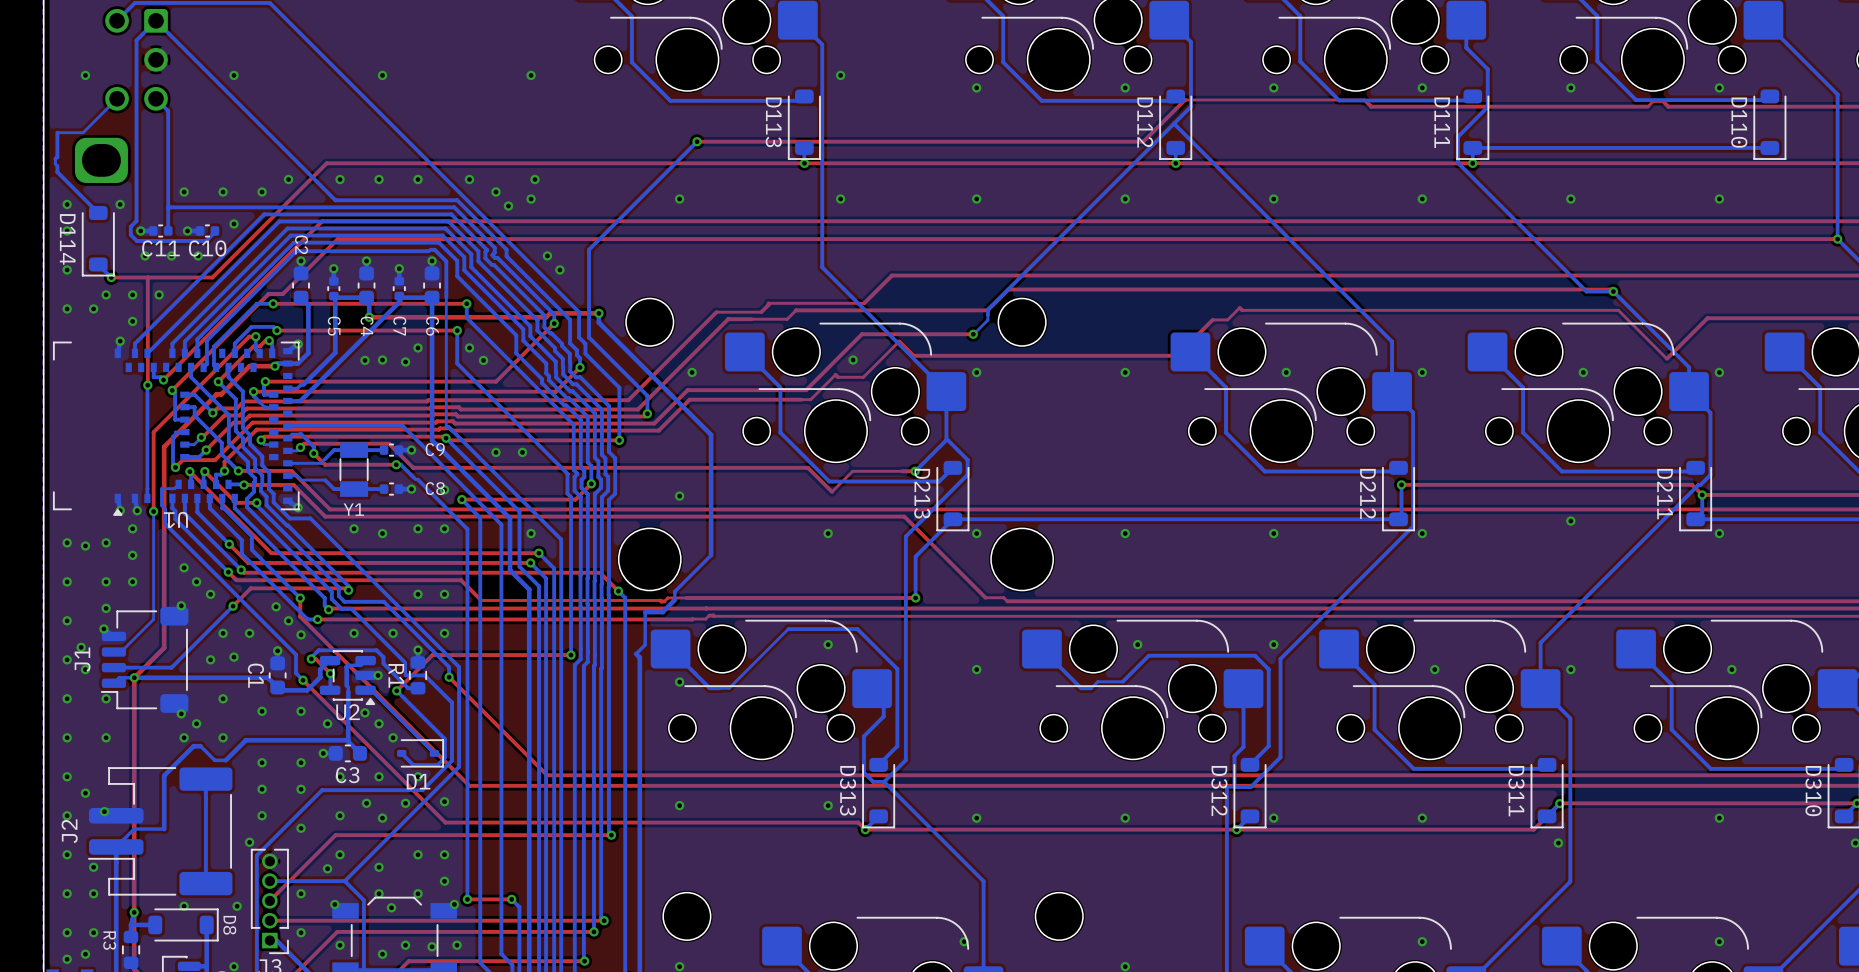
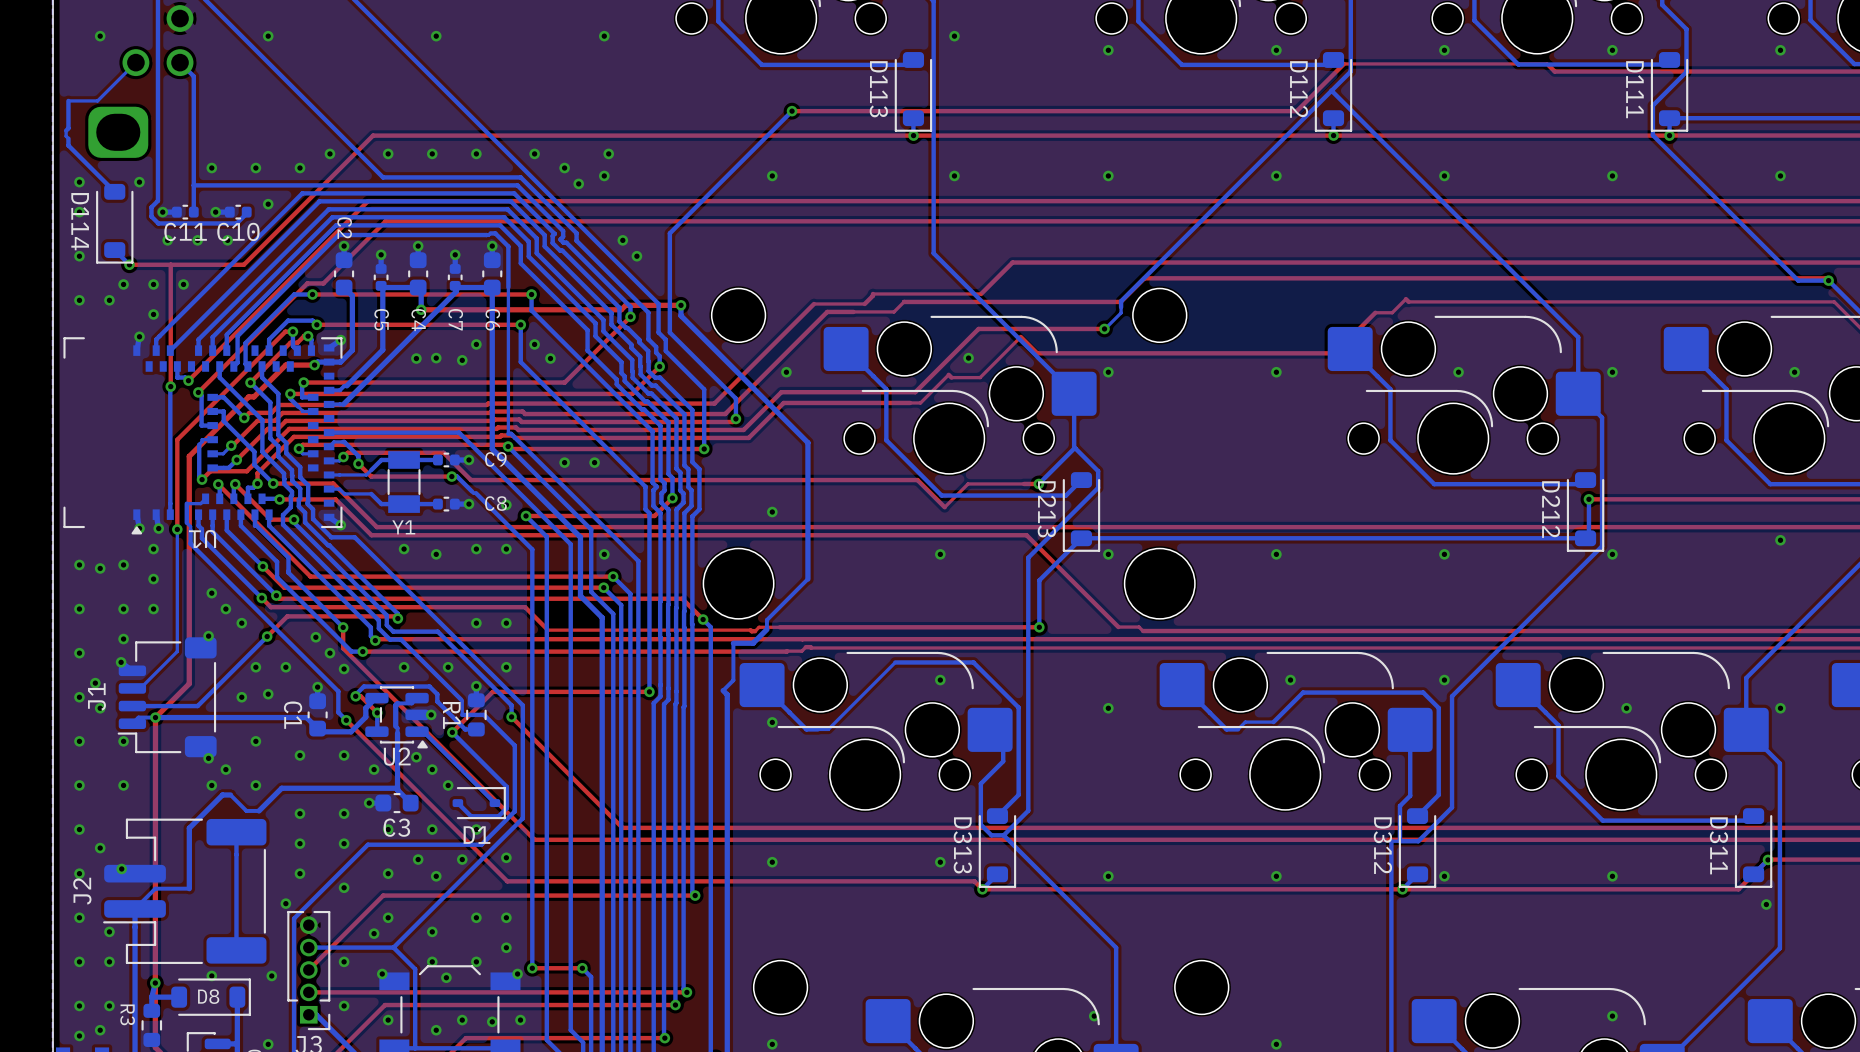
D8 name rotation: 0° (229, 925) -> 90° counterclockwise (208, 996)
D8 name position: D8 (229, 925) -> D8 (208, 996)

